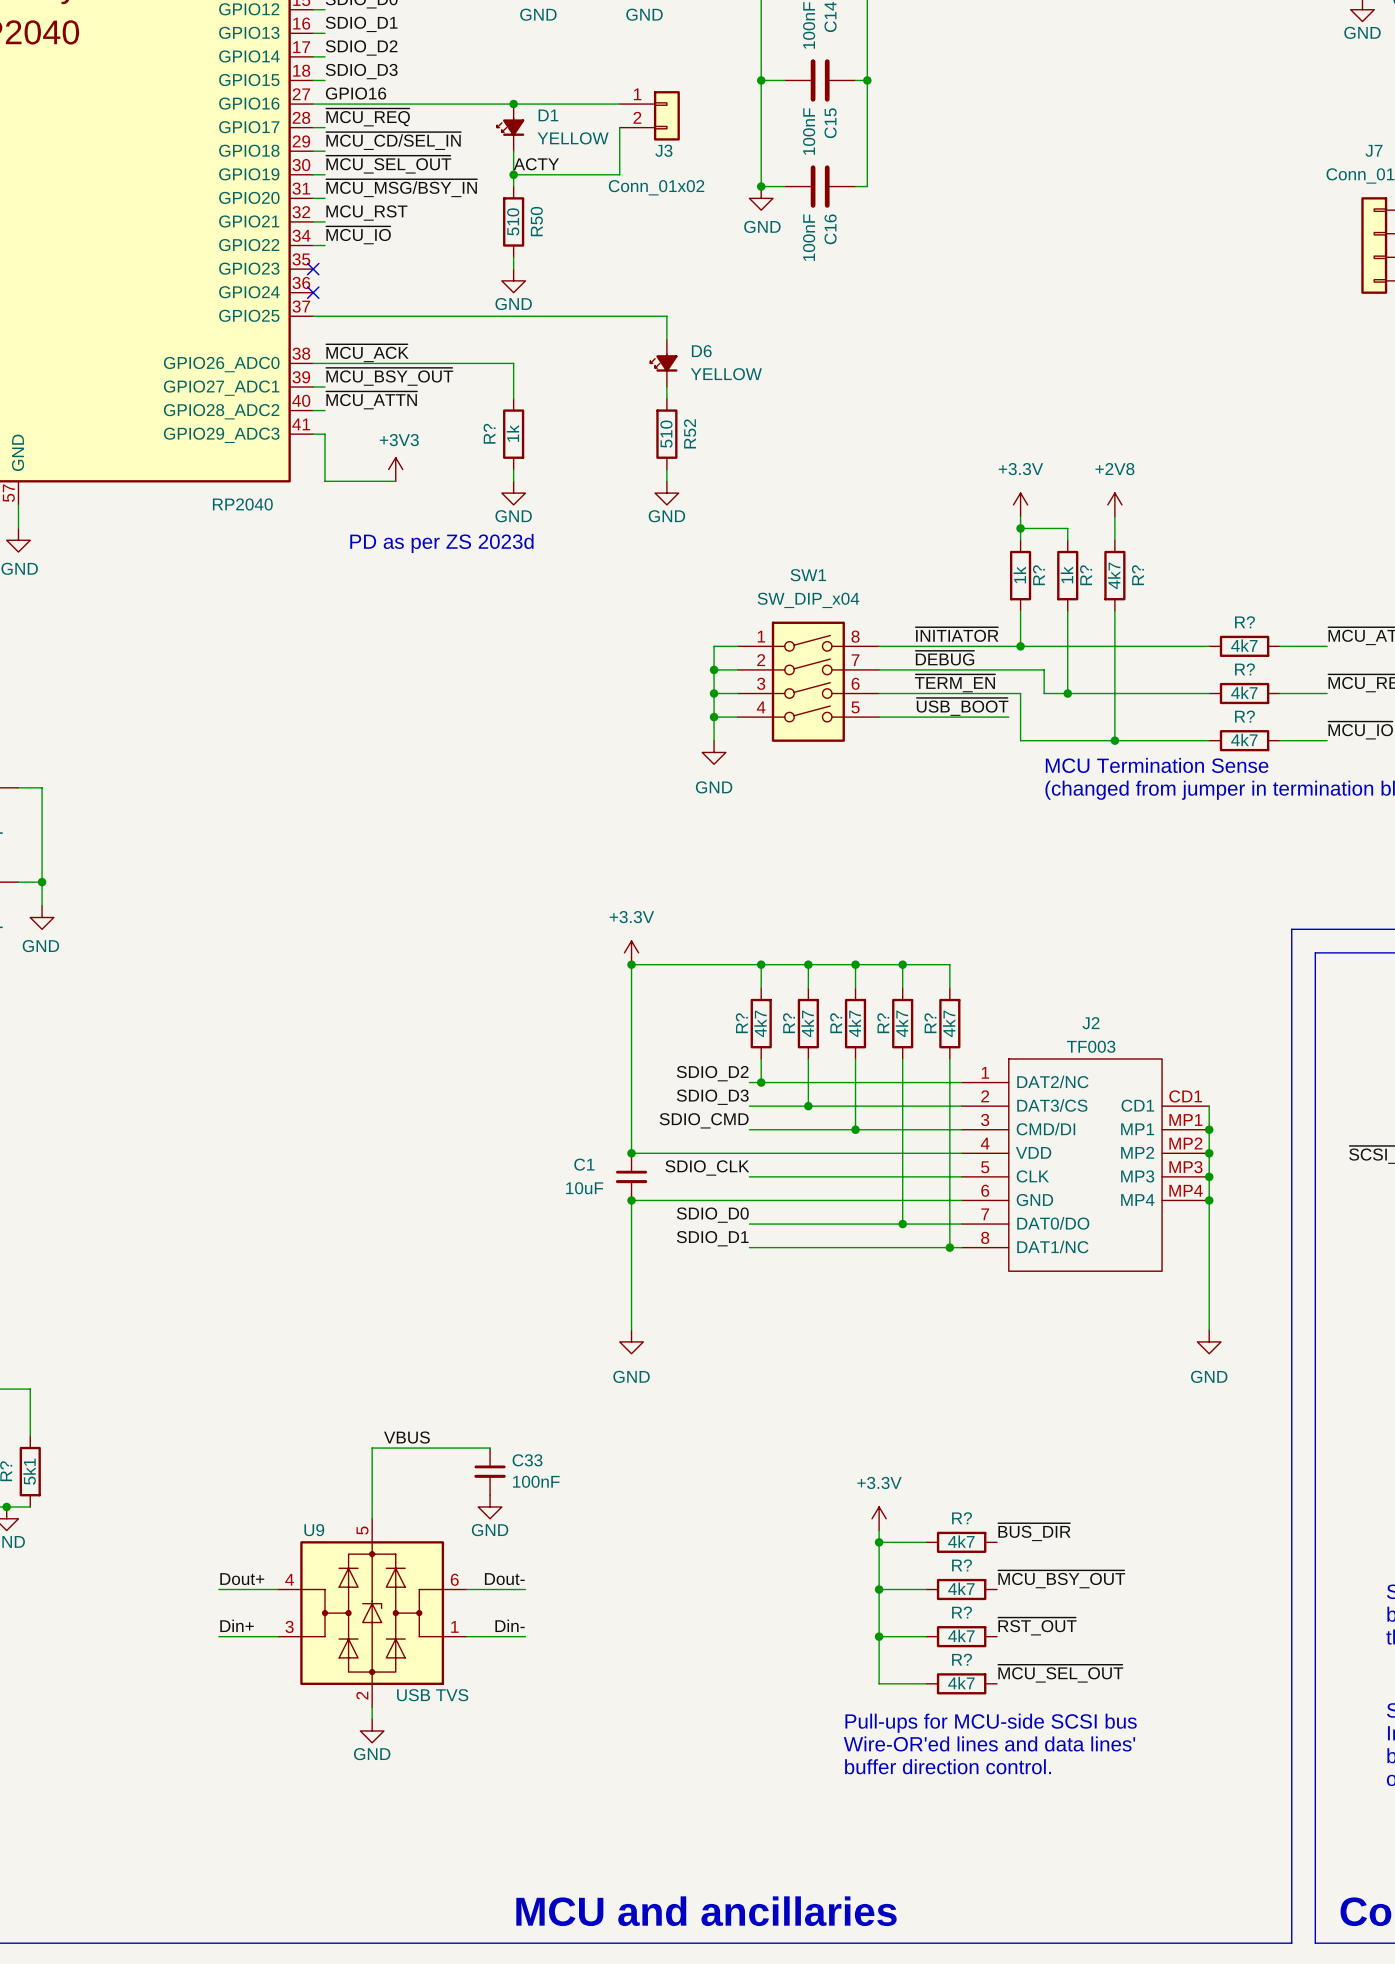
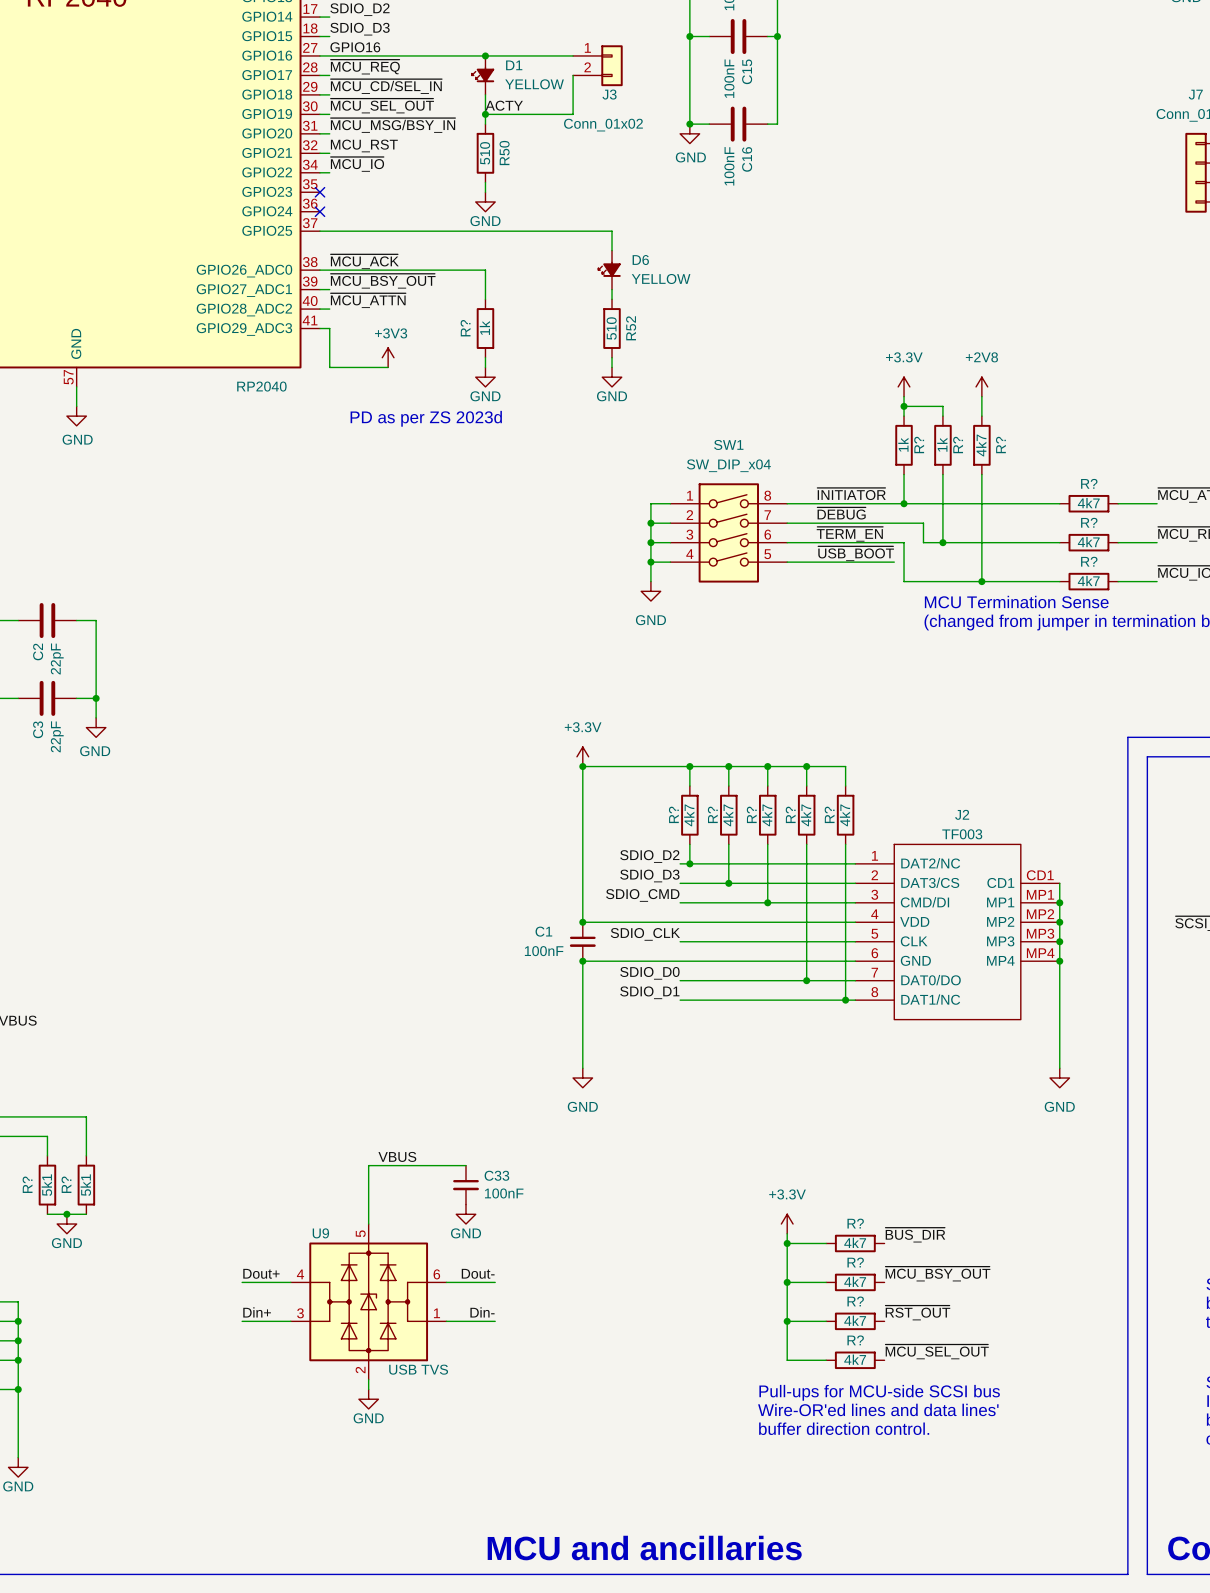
C1 value: 10uF (584, 1188) -> 100nF (544, 951)

